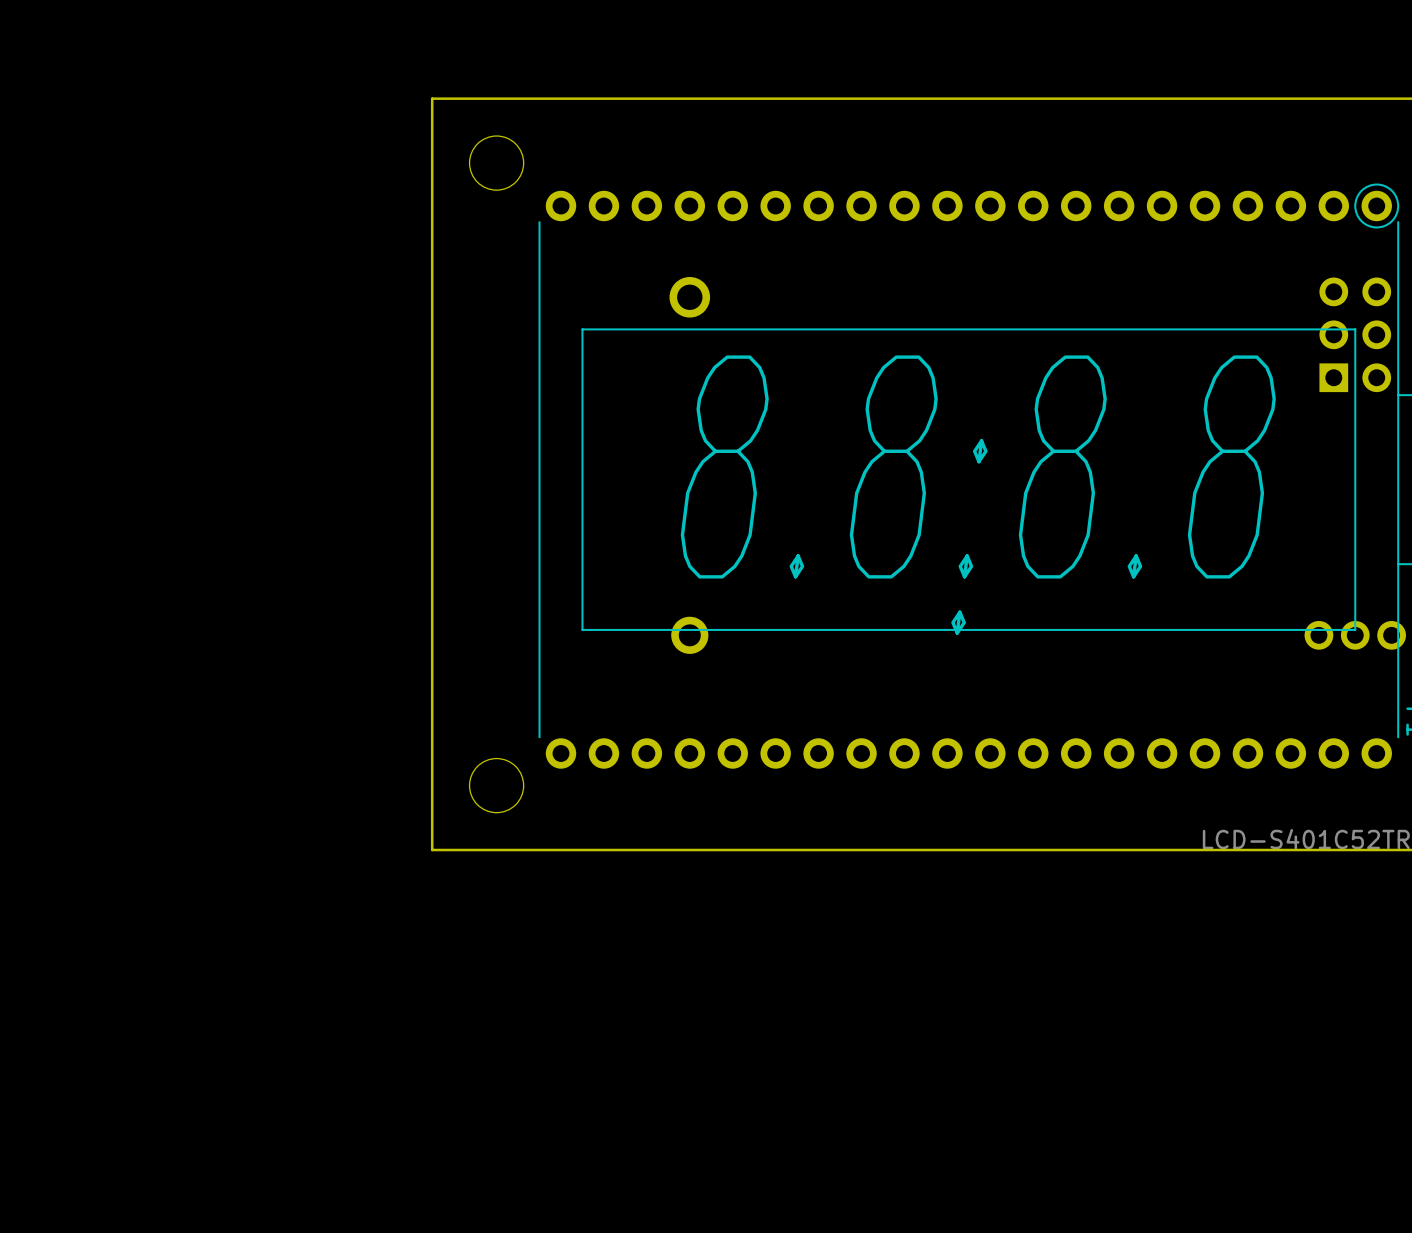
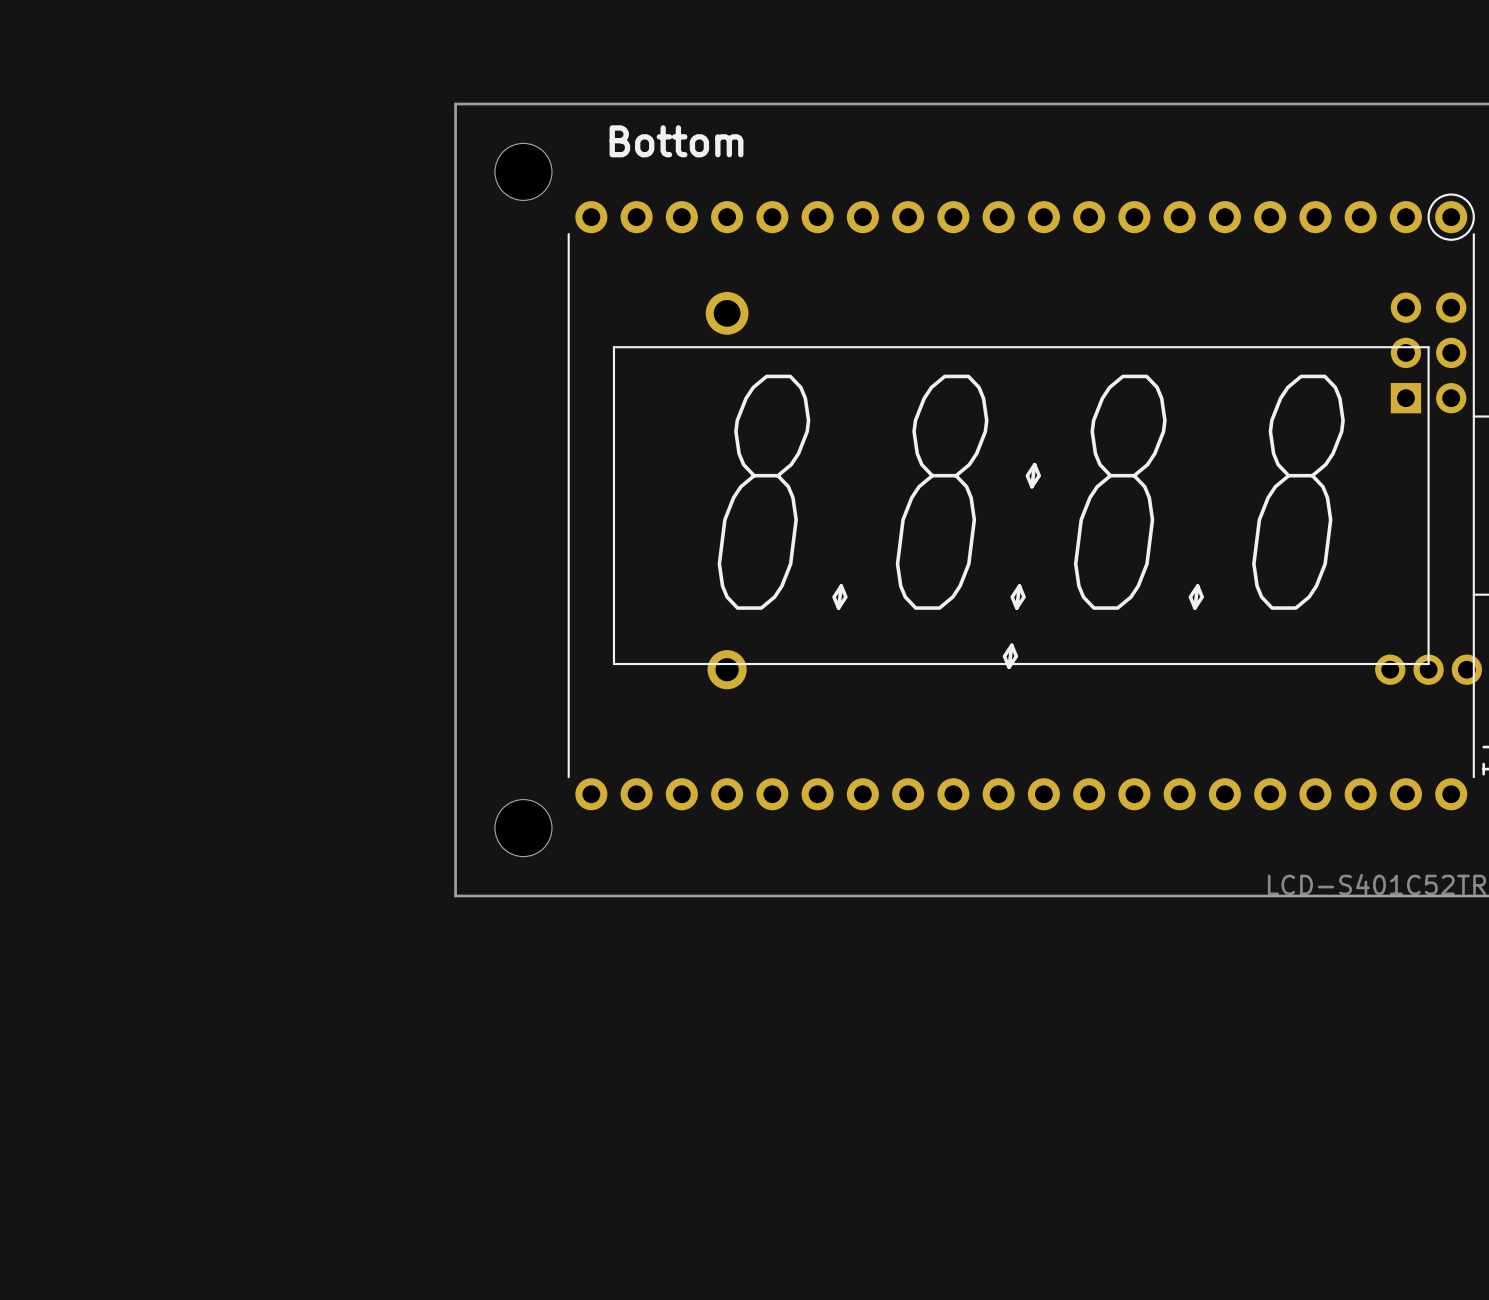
text: none -> Bottom (676, 141)

